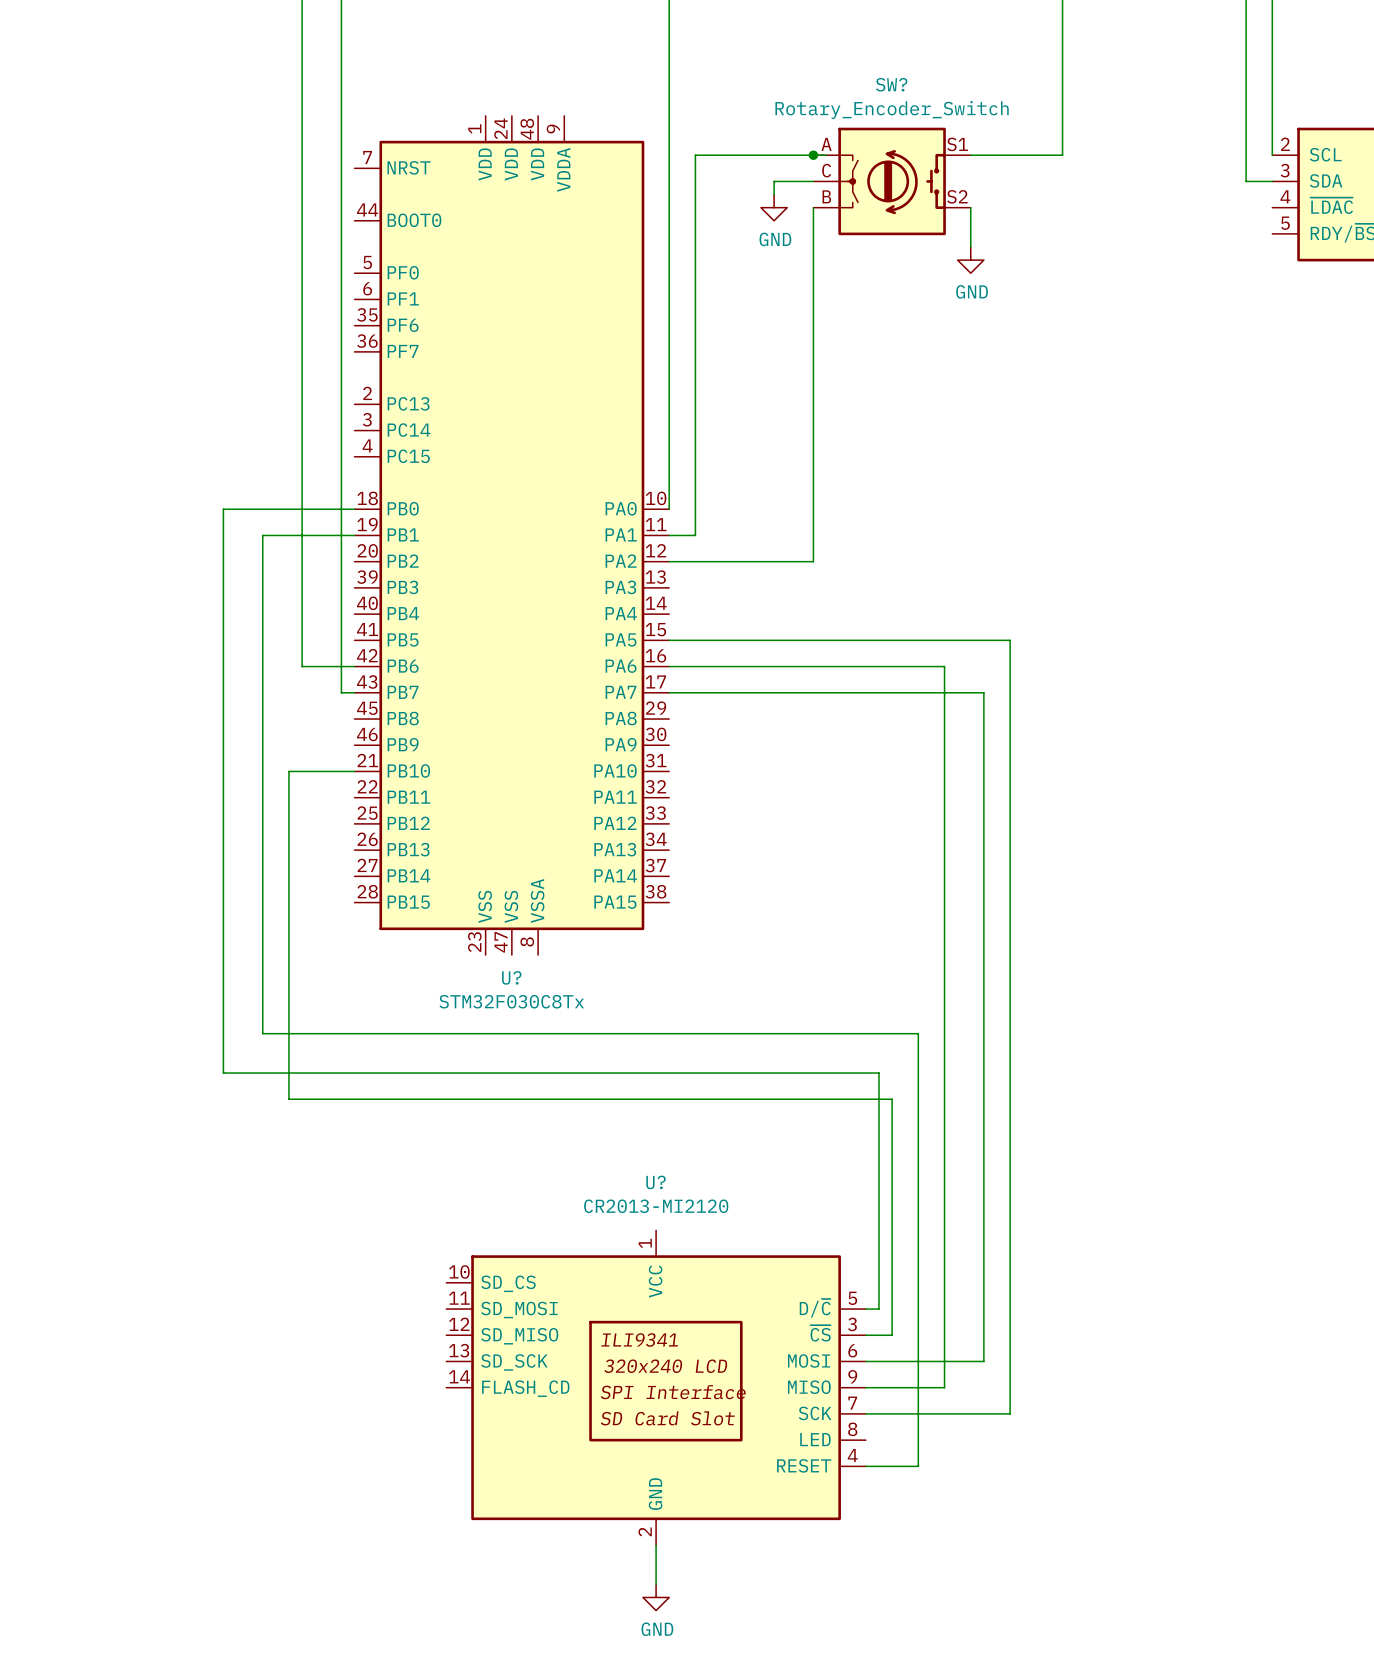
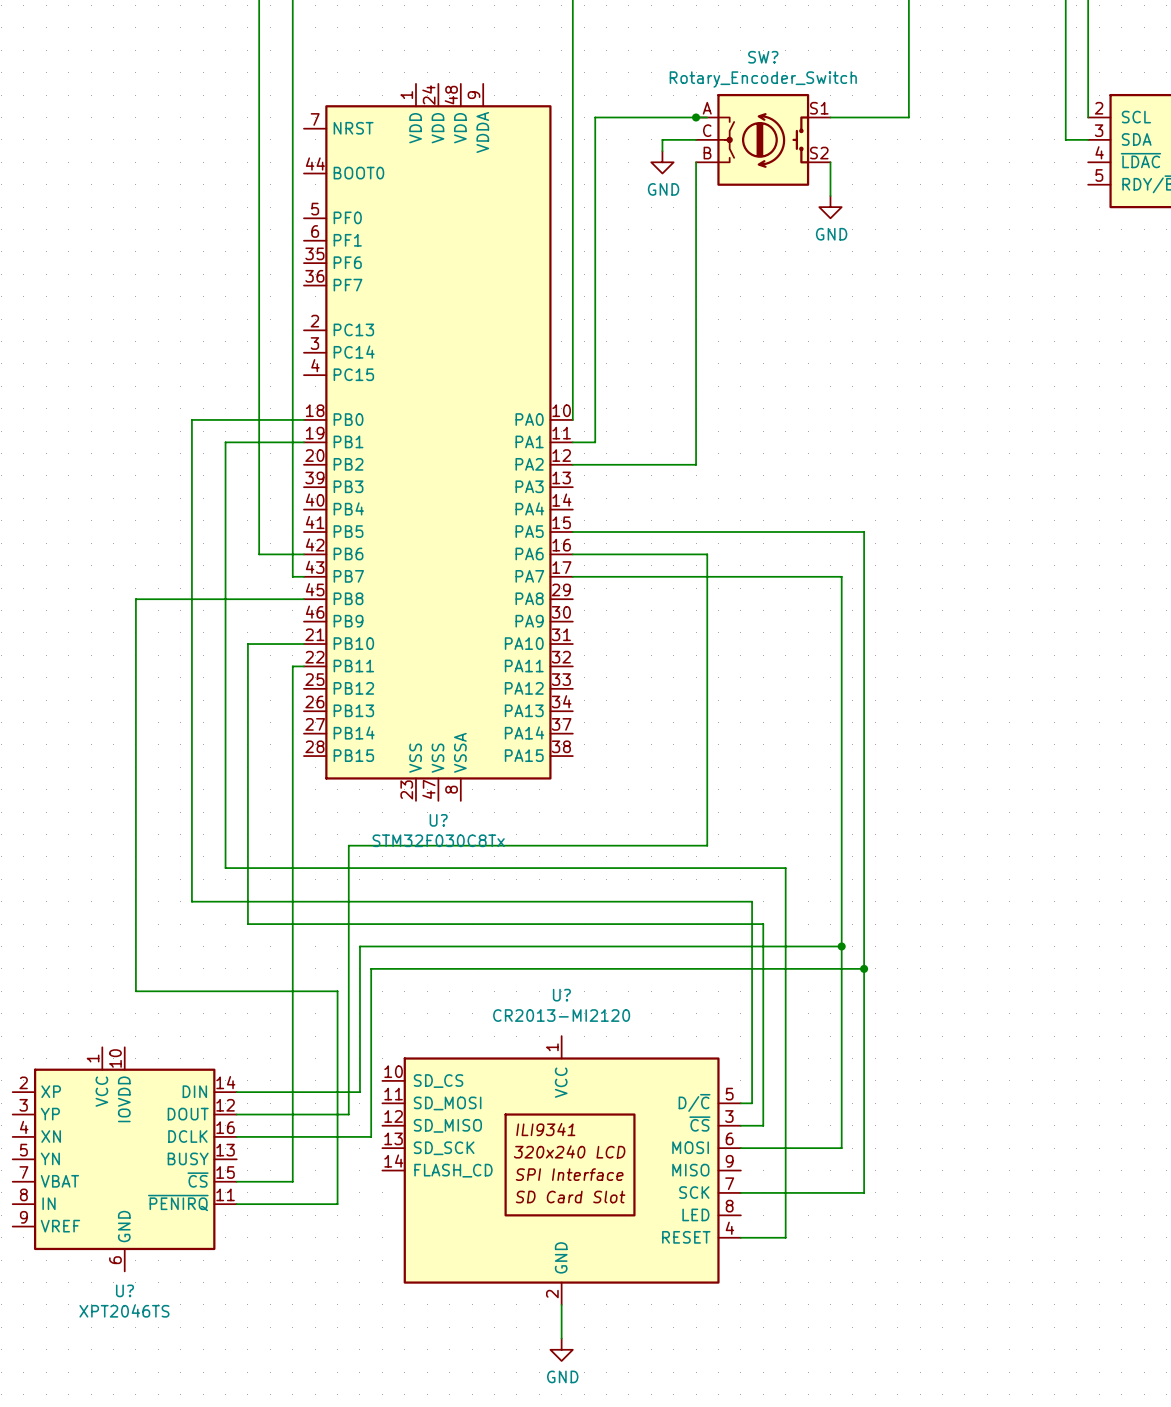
wire: (826, 666) (944, 666) (944, 1387) (865, 1387) -> (707, 554) (707, 845) (348, 845) (348, 1114) (236, 1114)
wire: none -> (303, 599) (135, 599) (135, 991) (337, 991) (337, 1204) (236, 1204)
wire: none -> (303, 666) (292, 666) (292, 1181) (236, 1181)
wire: none -> (841, 946) (359, 946) (359, 1092) (236, 1092)
junction: none -> (841, 946)
wire: none -> (864, 968) (371, 968) (371, 1136) (236, 1136)
junction: none -> (864, 968)
U?: none -> XPT2046TS (124, 1159)

